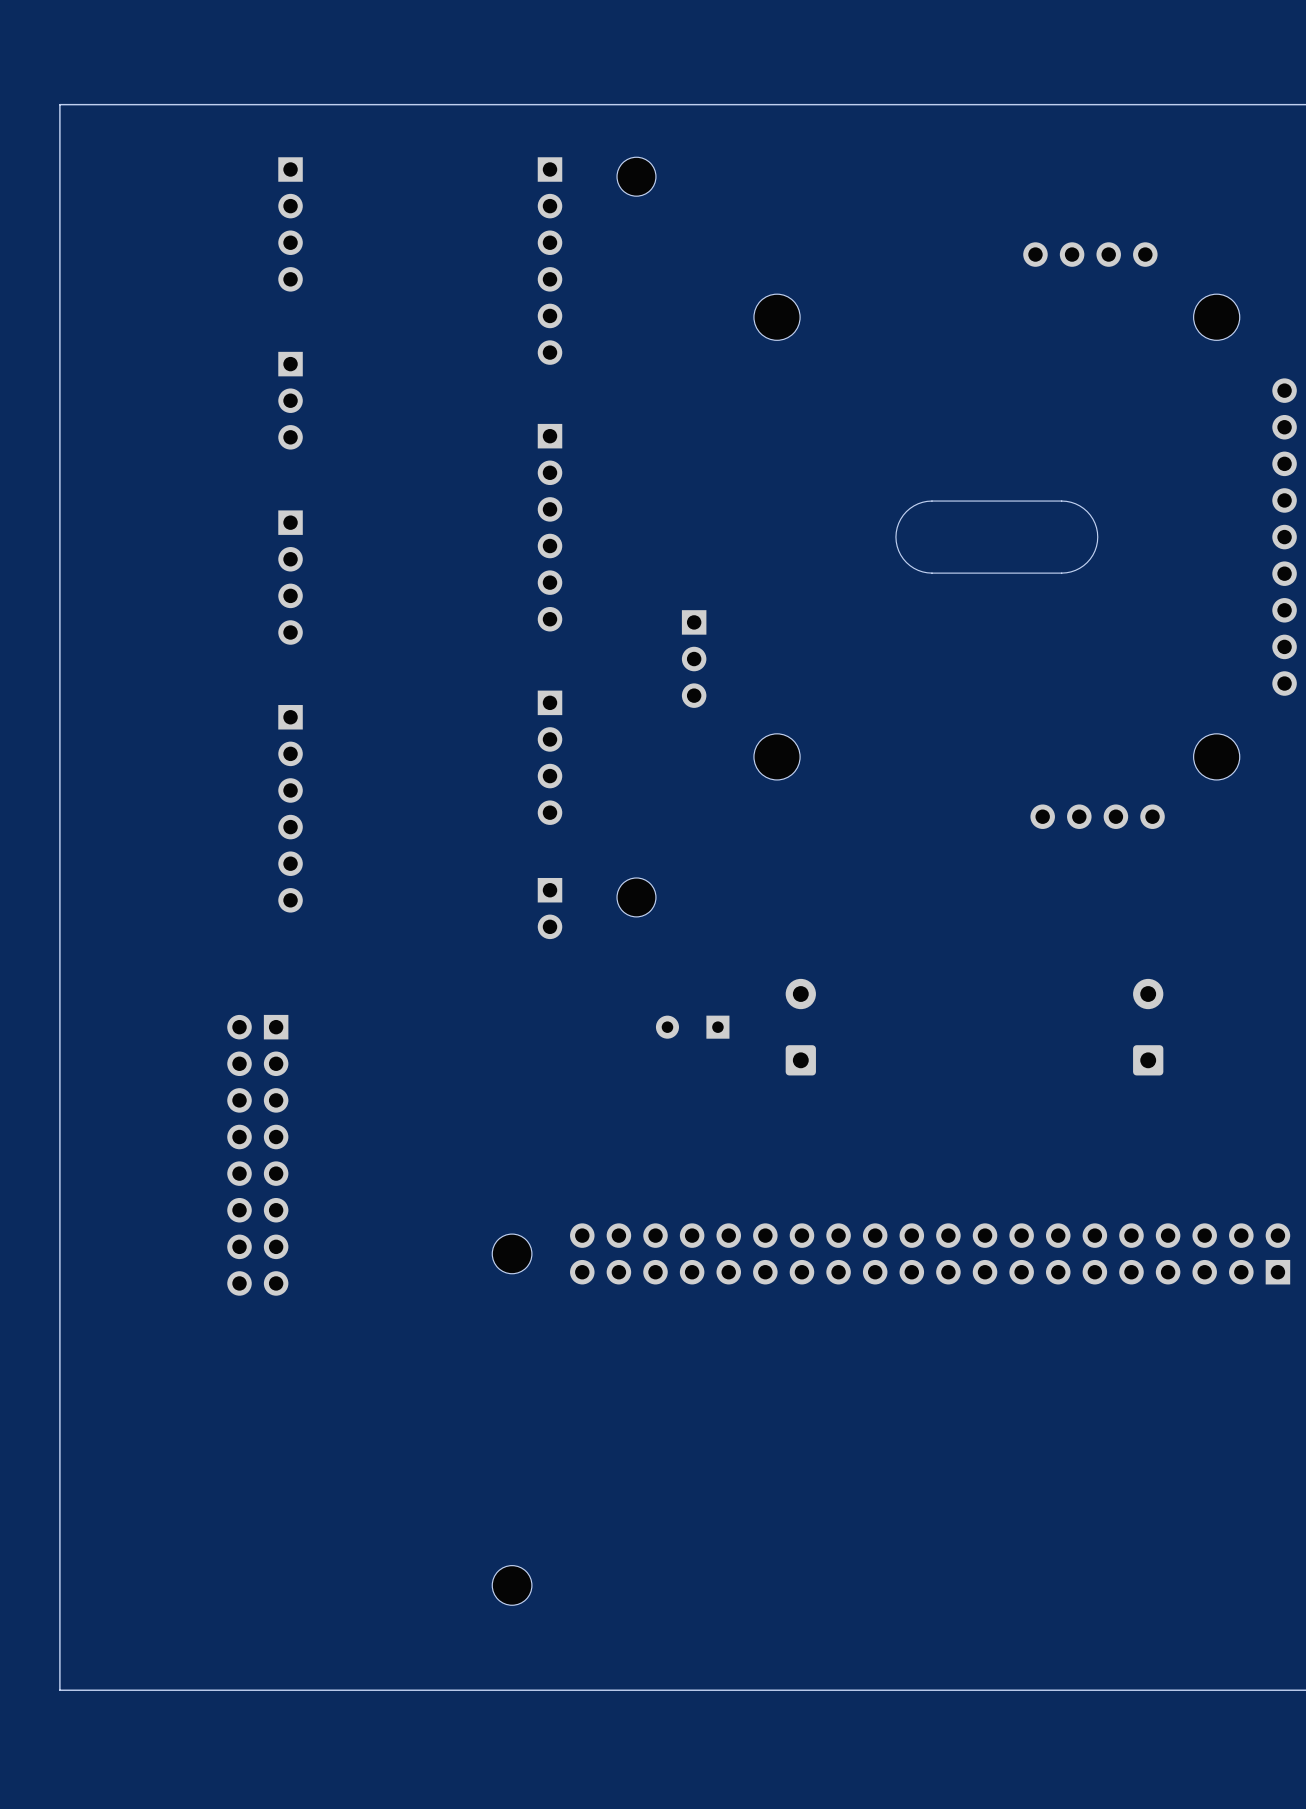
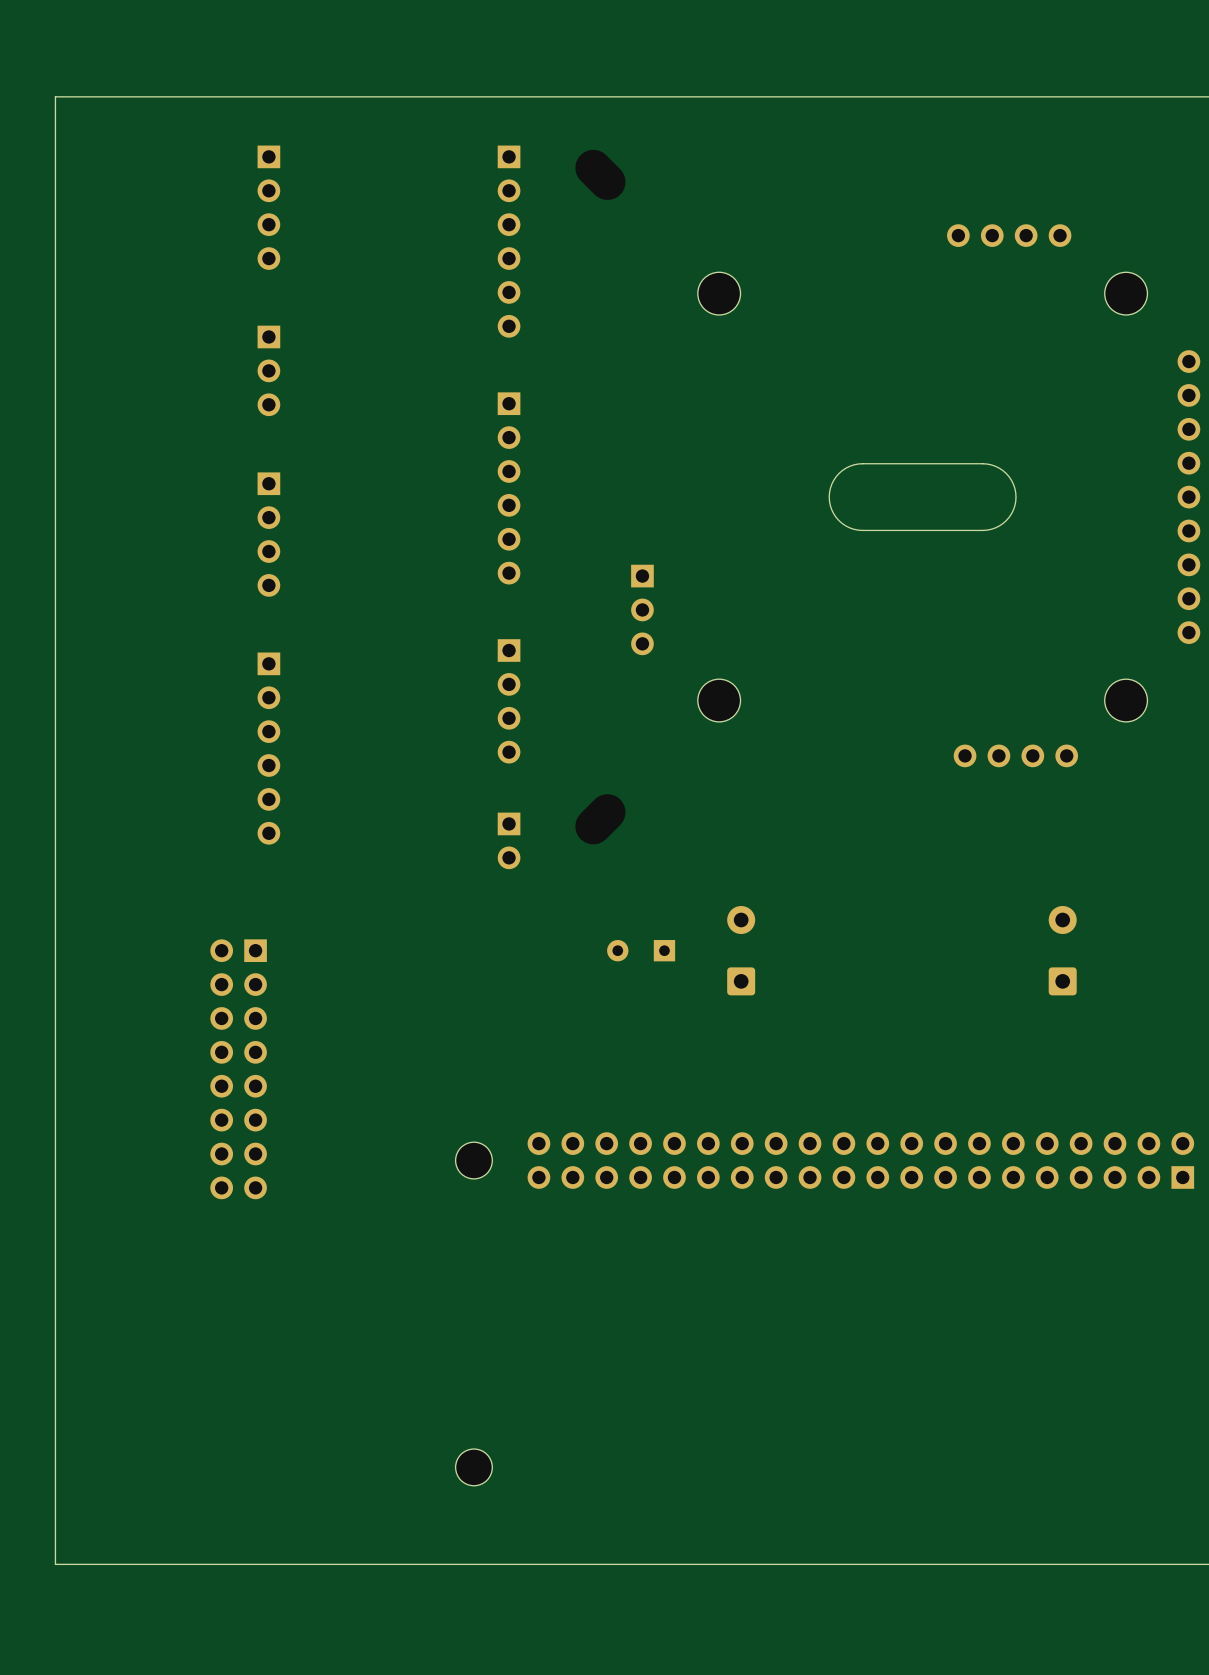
part: (636, 176) -> none
part: none -> (600, 174)
part: none -> (600, 819)
part: (636, 897) -> none

